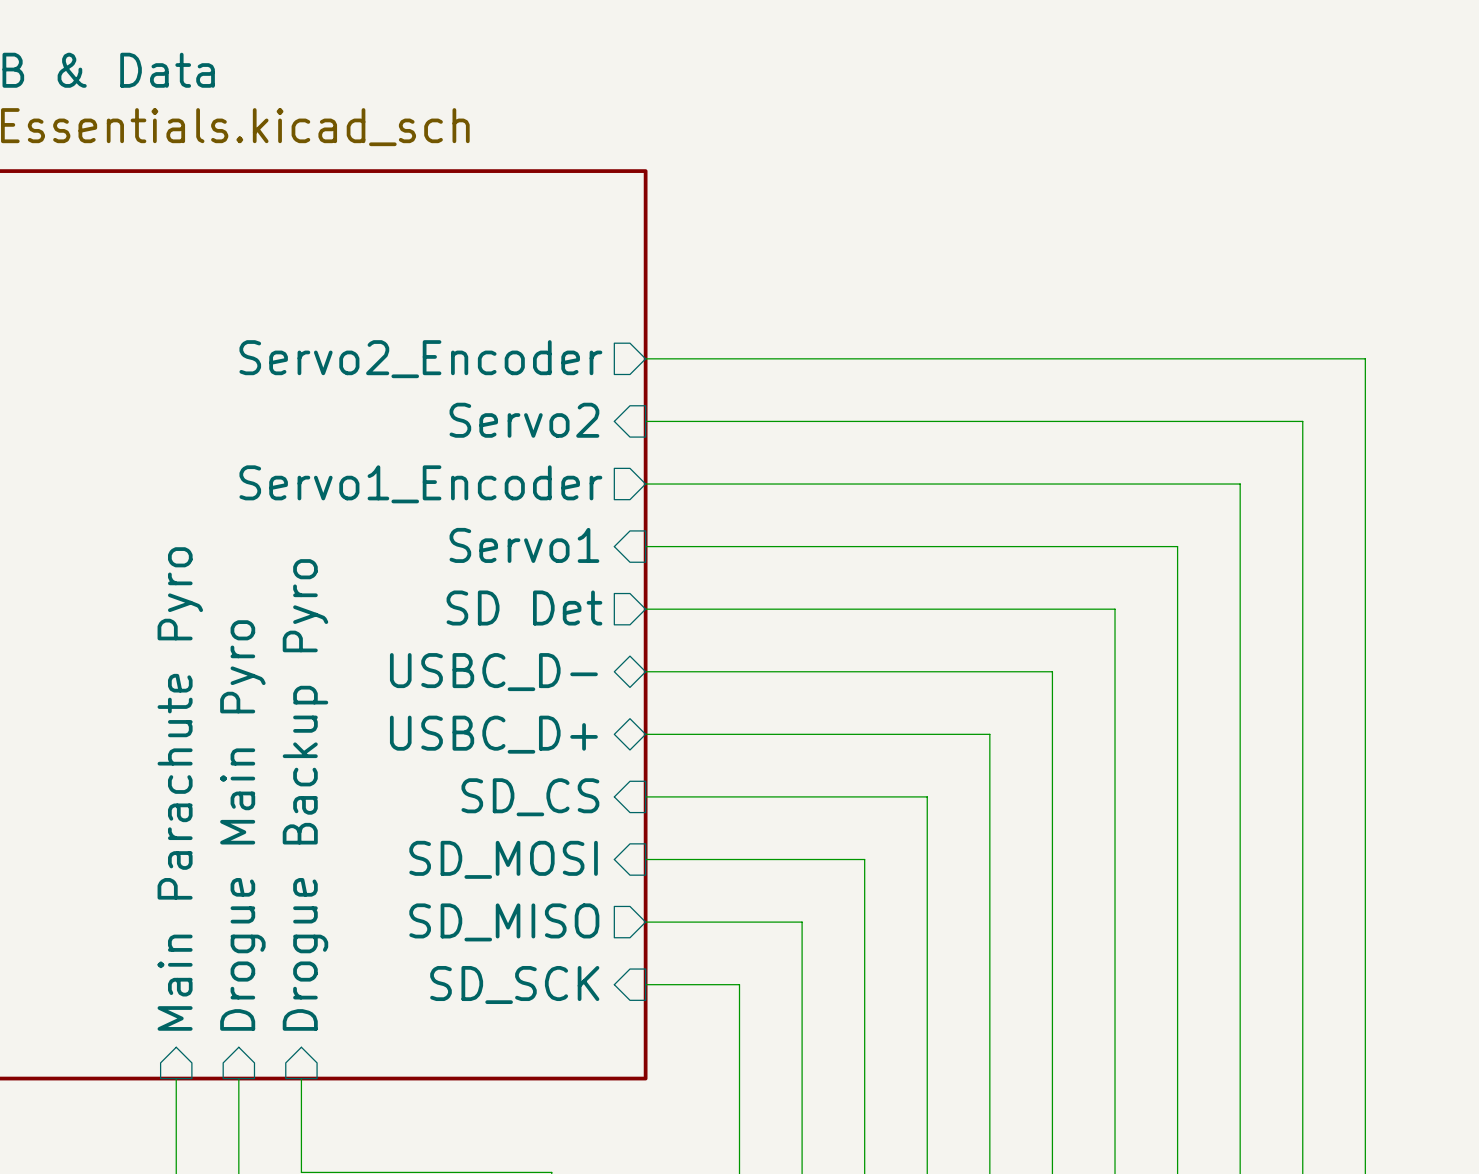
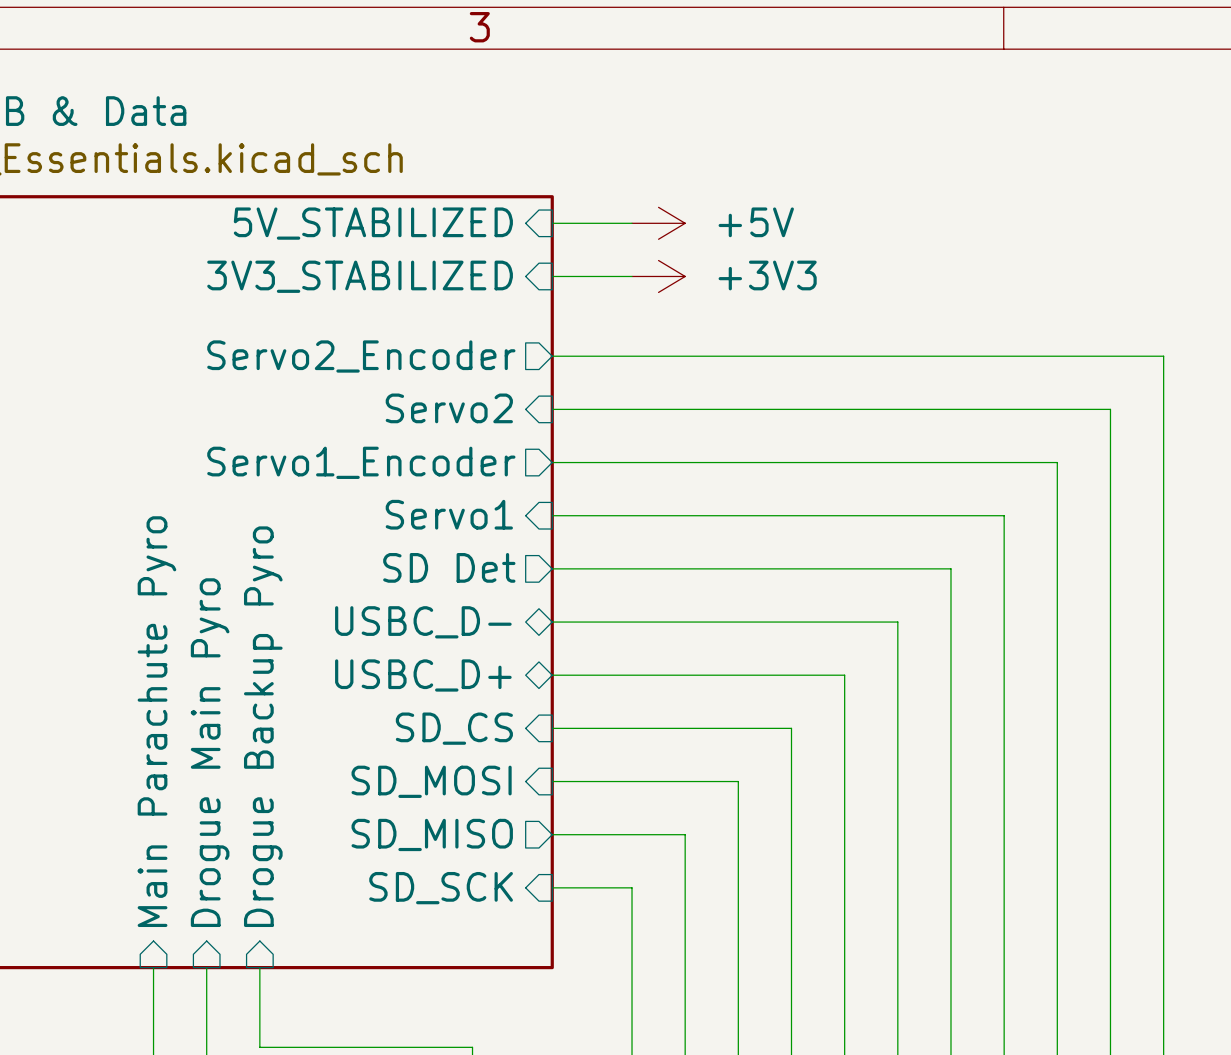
sheet pin: none -> 5V_STABILIZED (373, 223)
wire: none -> (552, 223) (632, 223)
power symbol: none -> +5V (658, 223)
wire: none -> (552, 276) (632, 276)
power symbol: none -> +3V3 (658, 276)
sheet pin: none -> 3V3_STABILIZED (360, 276)

